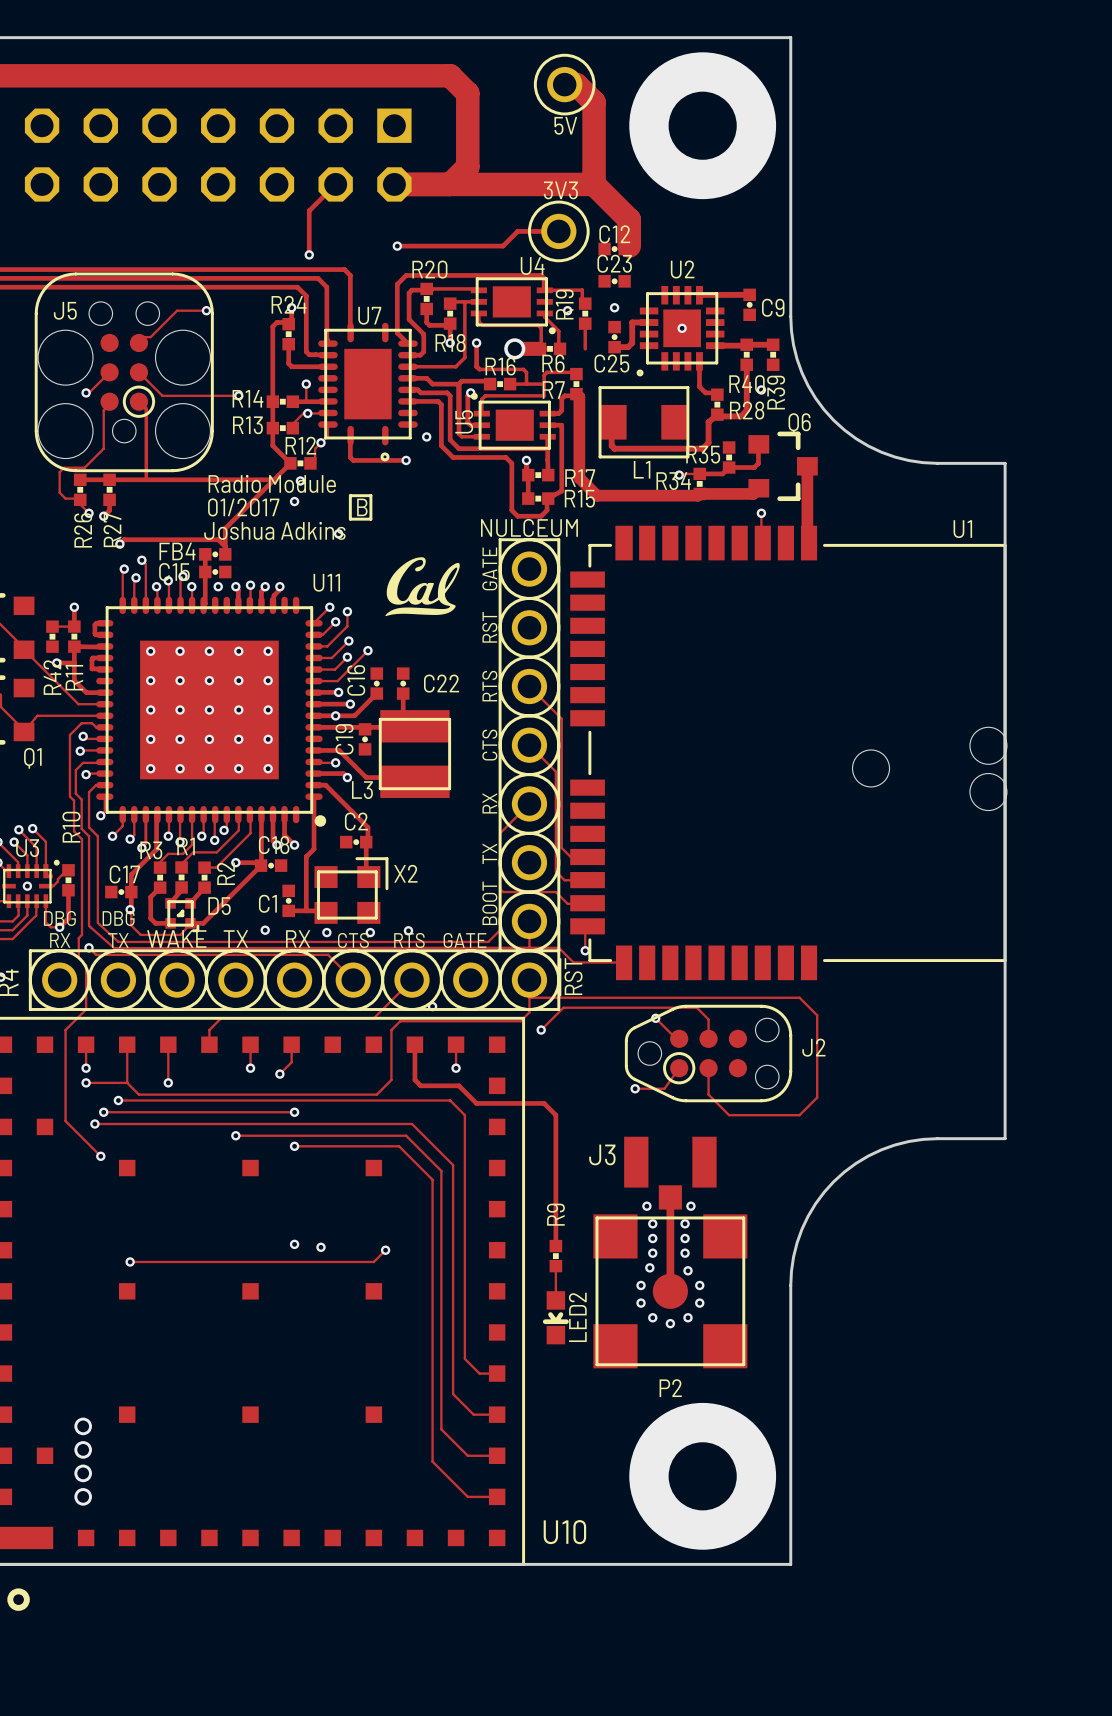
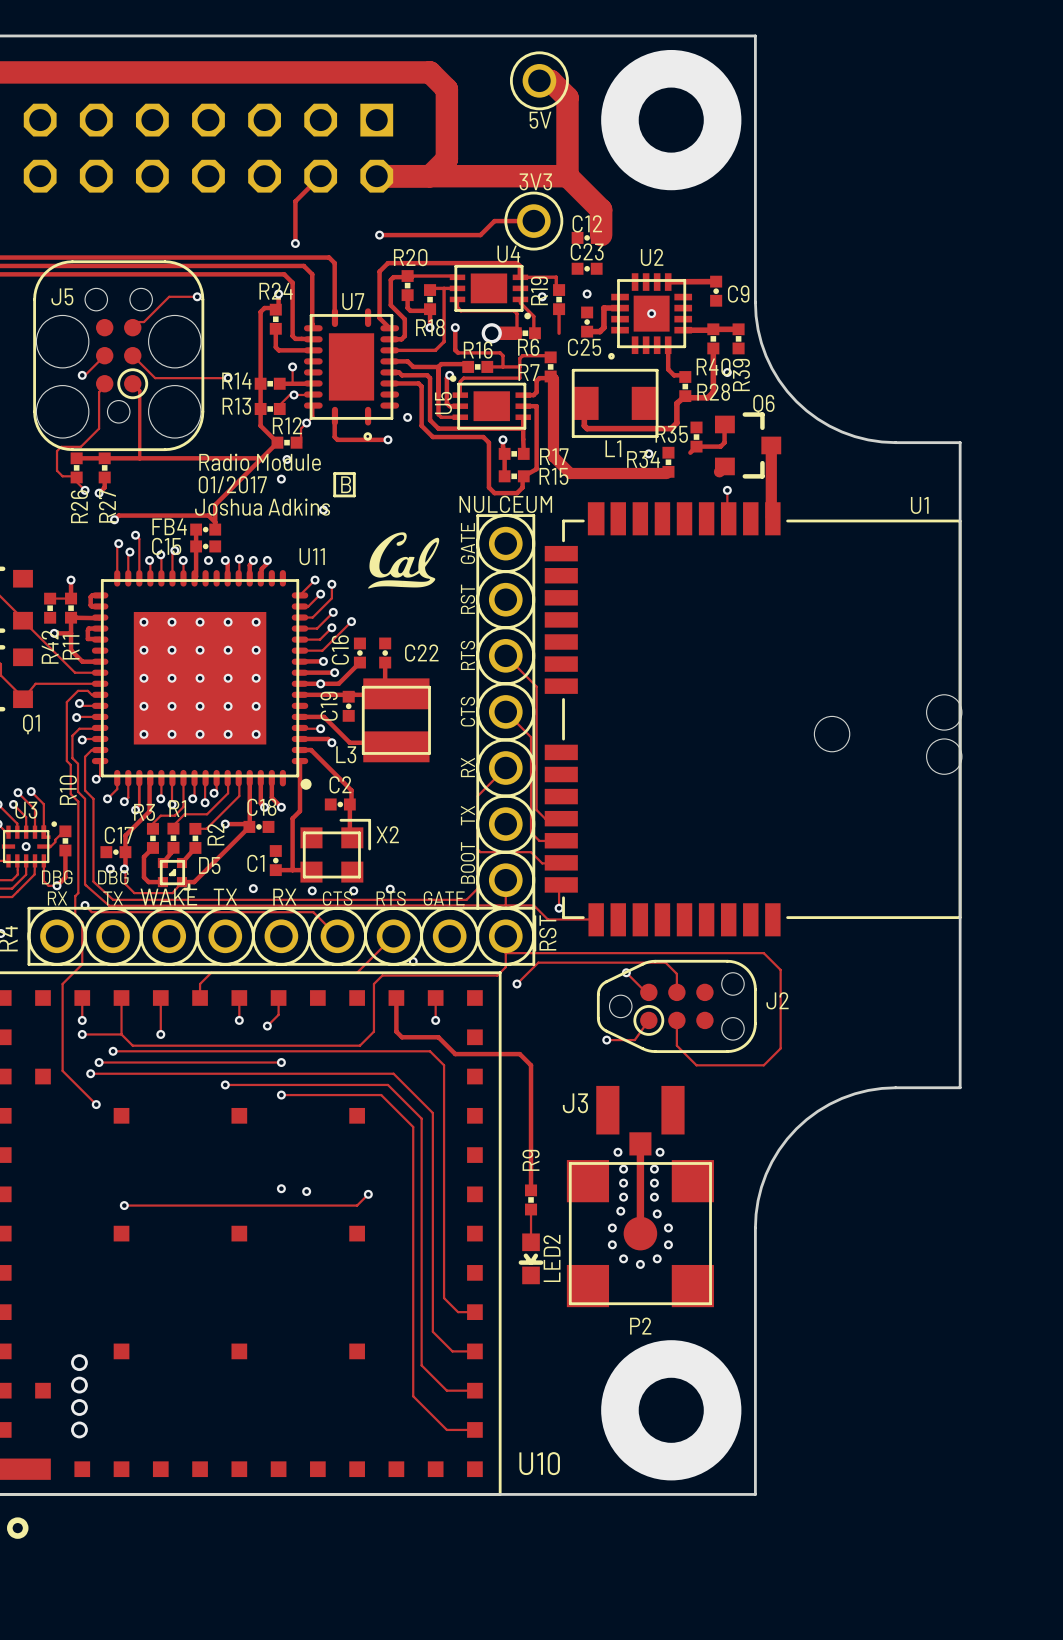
track: (680, 473) (722, 473) -> none
track: (753, 493) (699, 493) (698, 495) -> none
via: none -> (110, 868)

